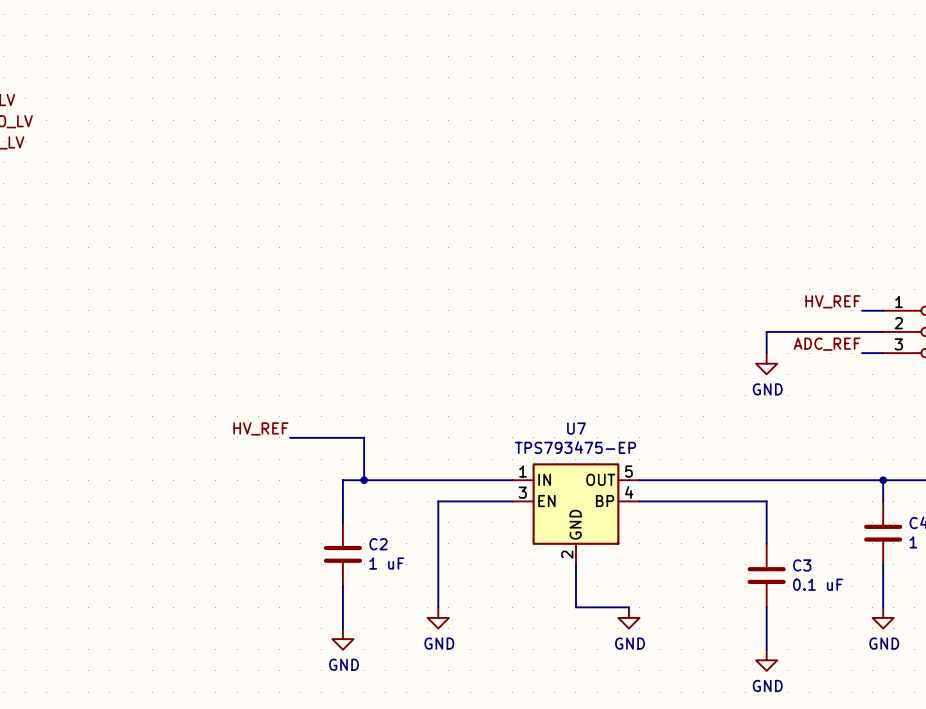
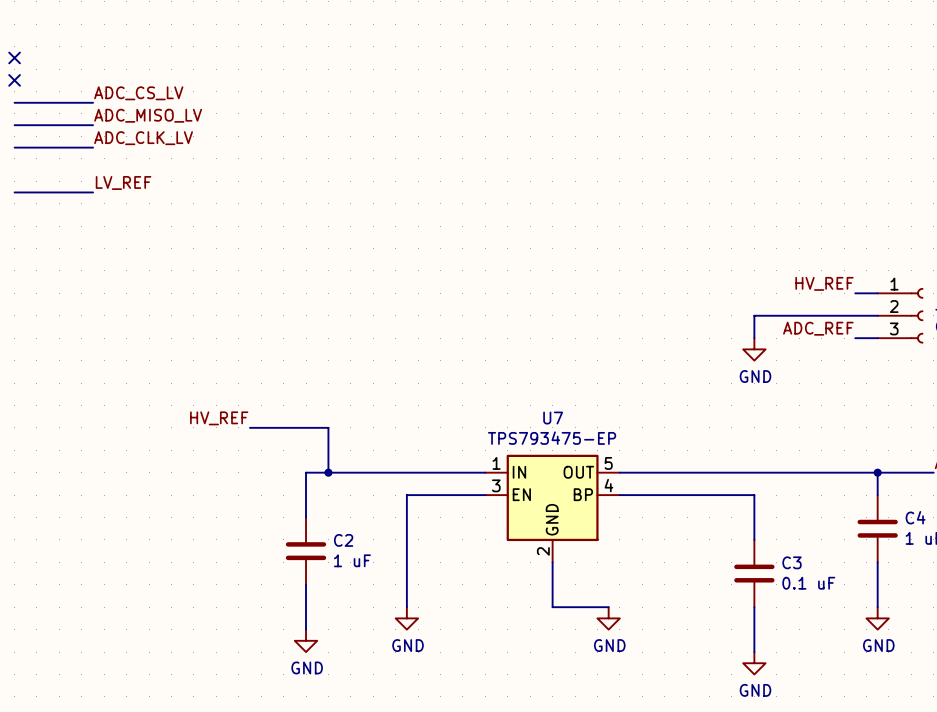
no-connect mark: none -> (14, 57)
no-connect mark: none -> (14, 80)
label: none -> ADC_CS_LV (138, 93)
wire: none -> (14, 102) (93, 102)
label: none -> ADC_MISO_LV (148, 115)
wire: none -> (14, 125) (93, 125)
label: none -> ADC_CLK_LV (143, 138)
wire: none -> (14, 147) (93, 147)
label: none -> LV_REF (123, 182)
wire: none -> (14, 192) (93, 192)

